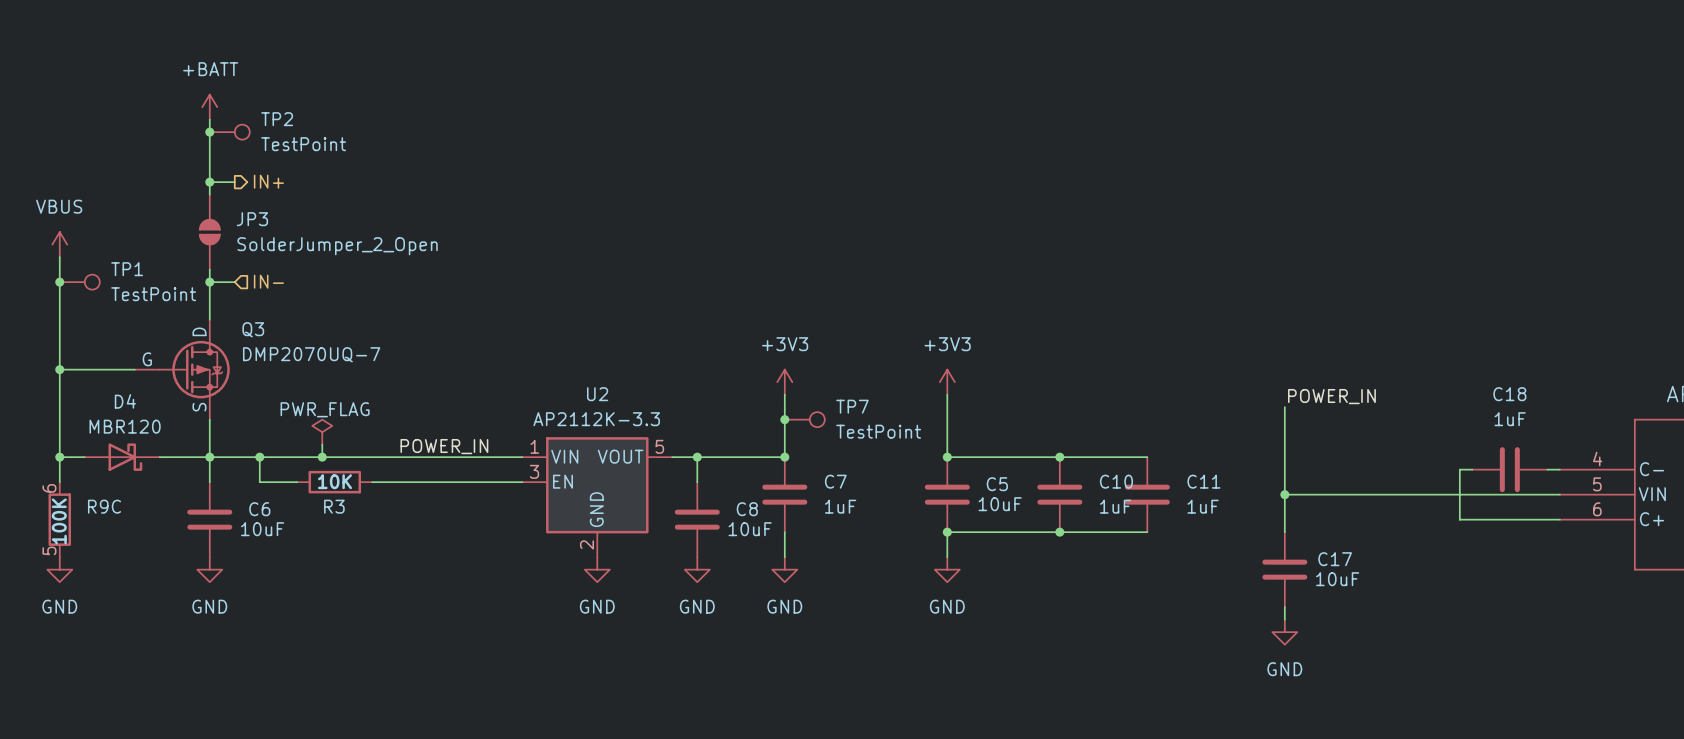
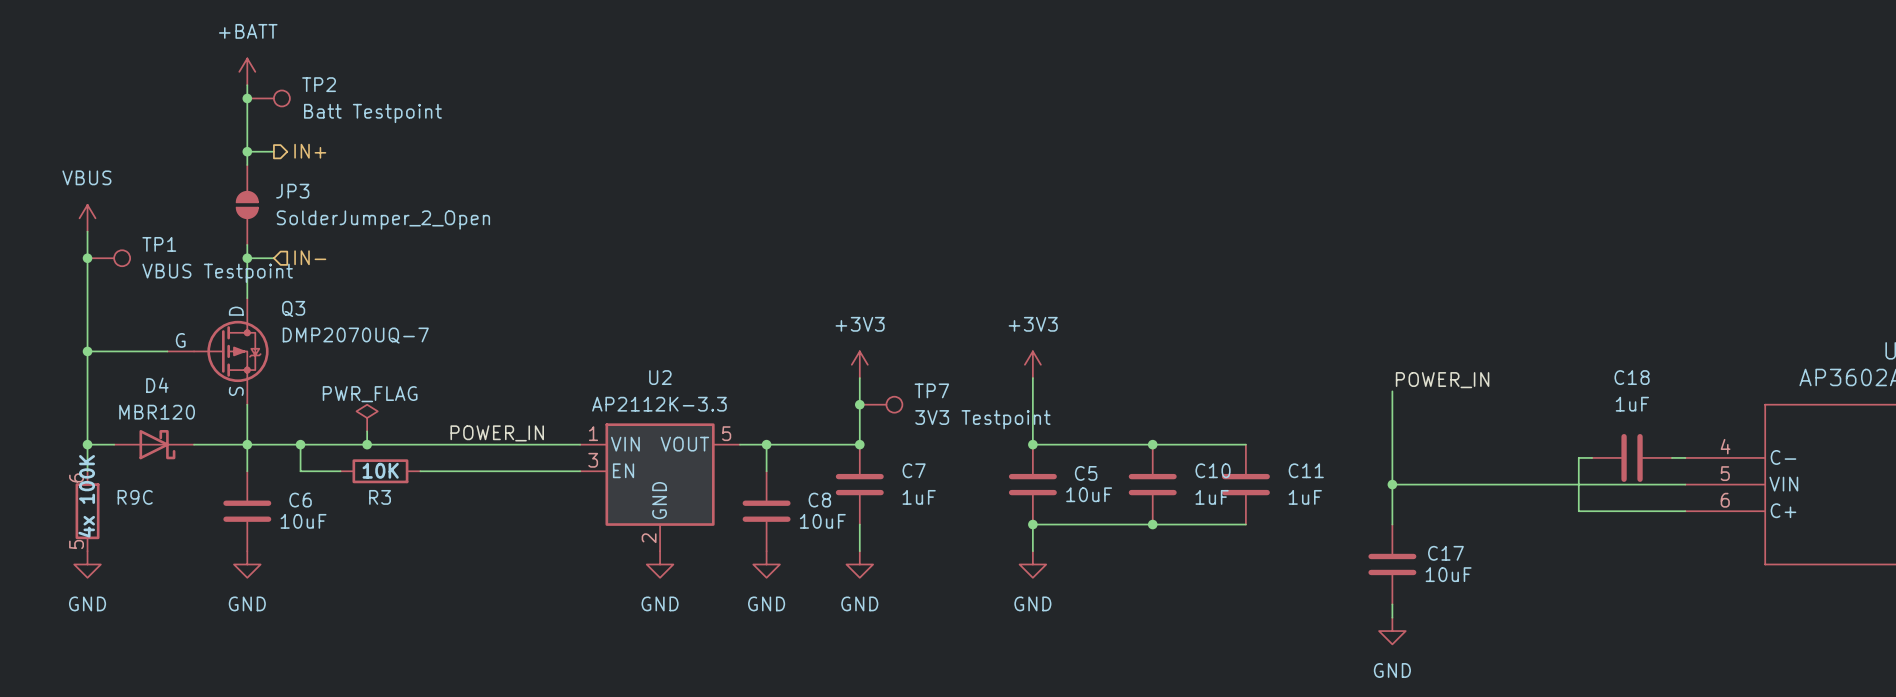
TP2 value: TestPoint (303, 144) -> Batt Testpoint (372, 113)
TP1 value: TestPoint (153, 294) -> VBUS Testpoint (217, 273)
TP7 value: TestPoint (878, 431) -> 3V3 Testpoint (982, 419)
R9C value: 100K (59, 521) -> 4x 100K (86, 496)

